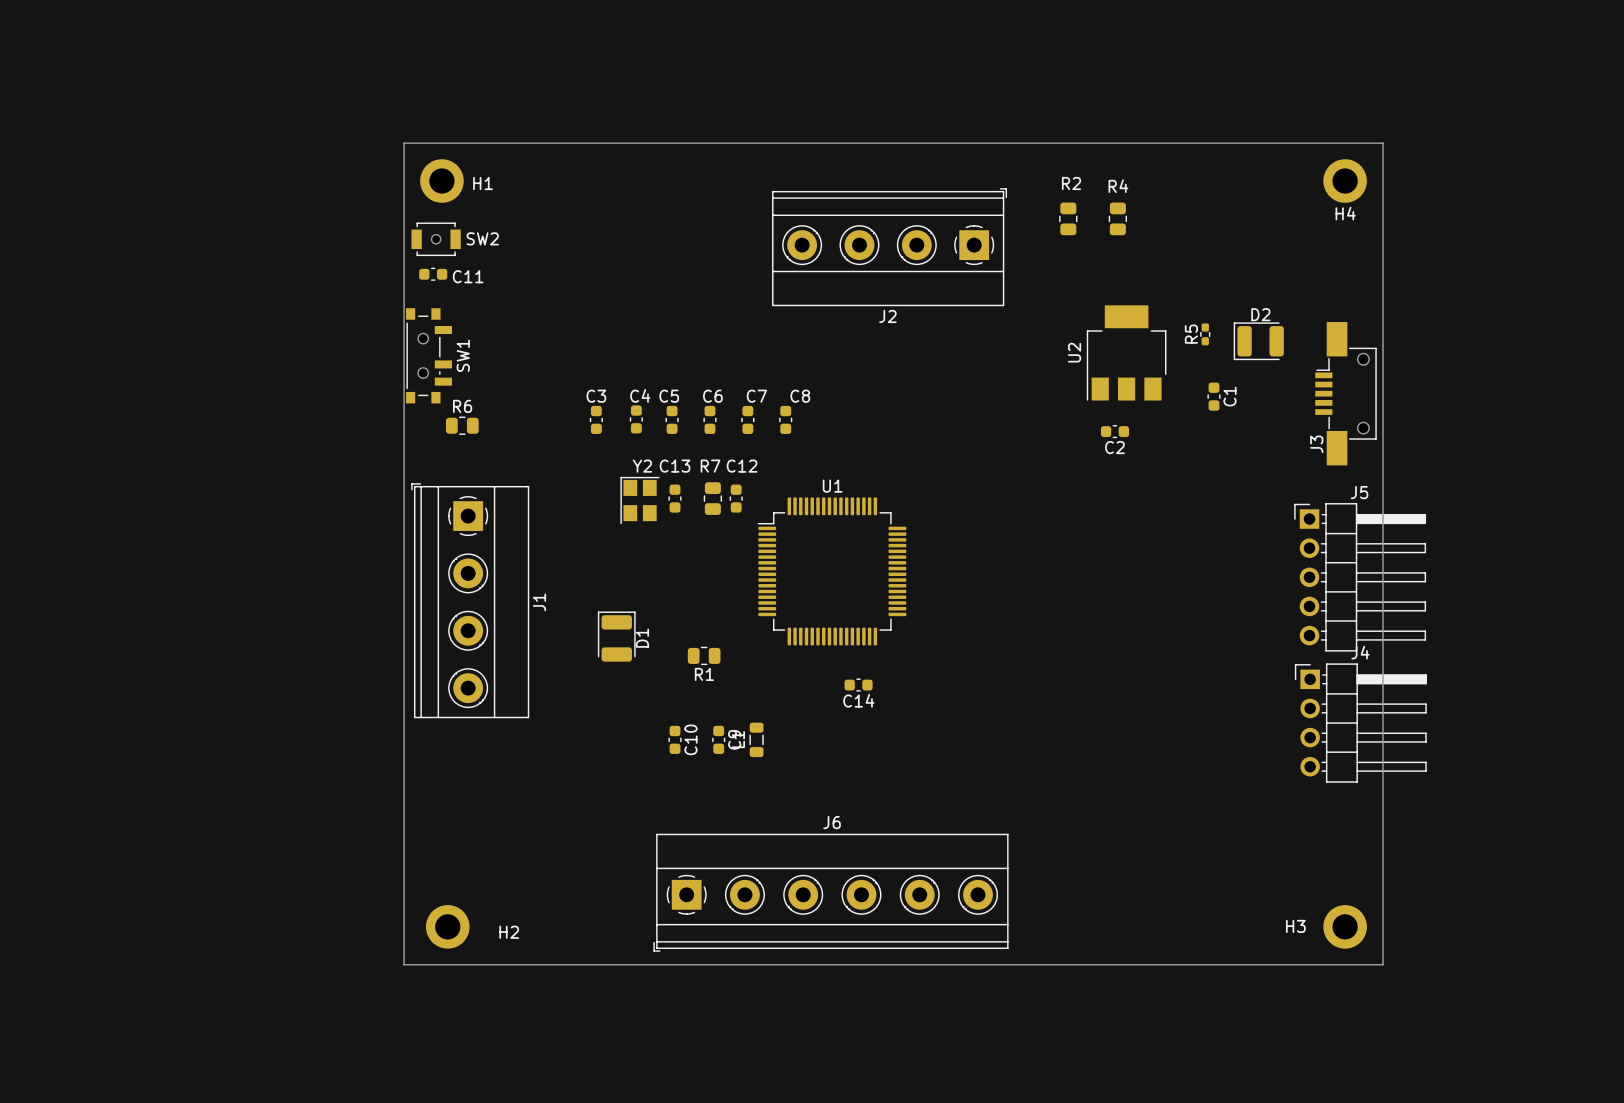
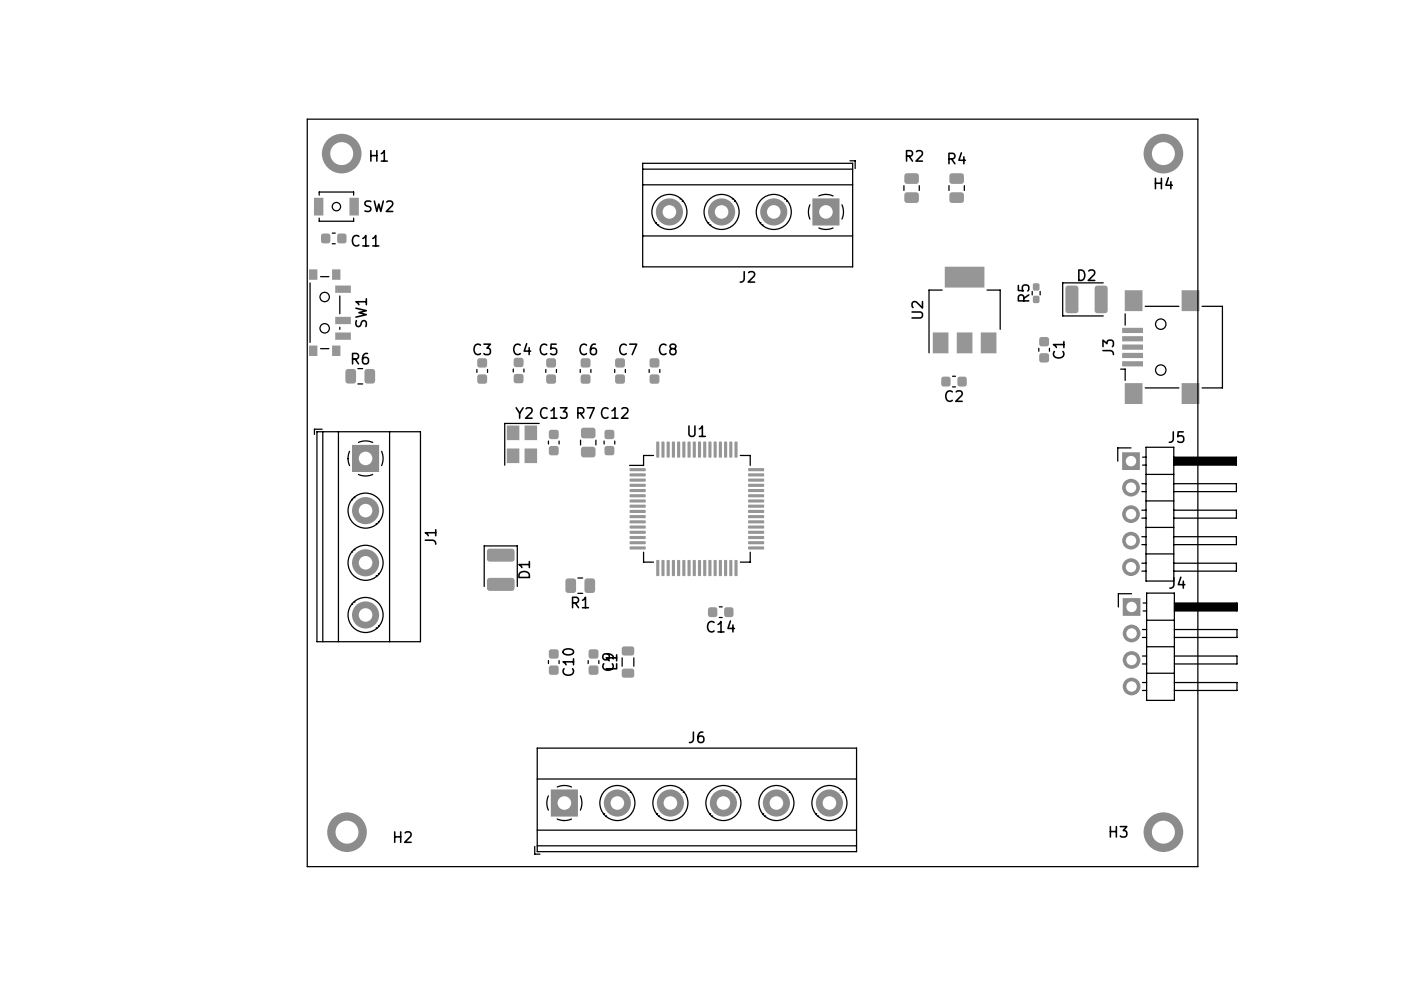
J3 footprint: [1315, 322, 1377, 466] -> [1120, 290, 1224, 404]
J3 name position: J3 (1316, 444) -> J3 (1108, 347)

